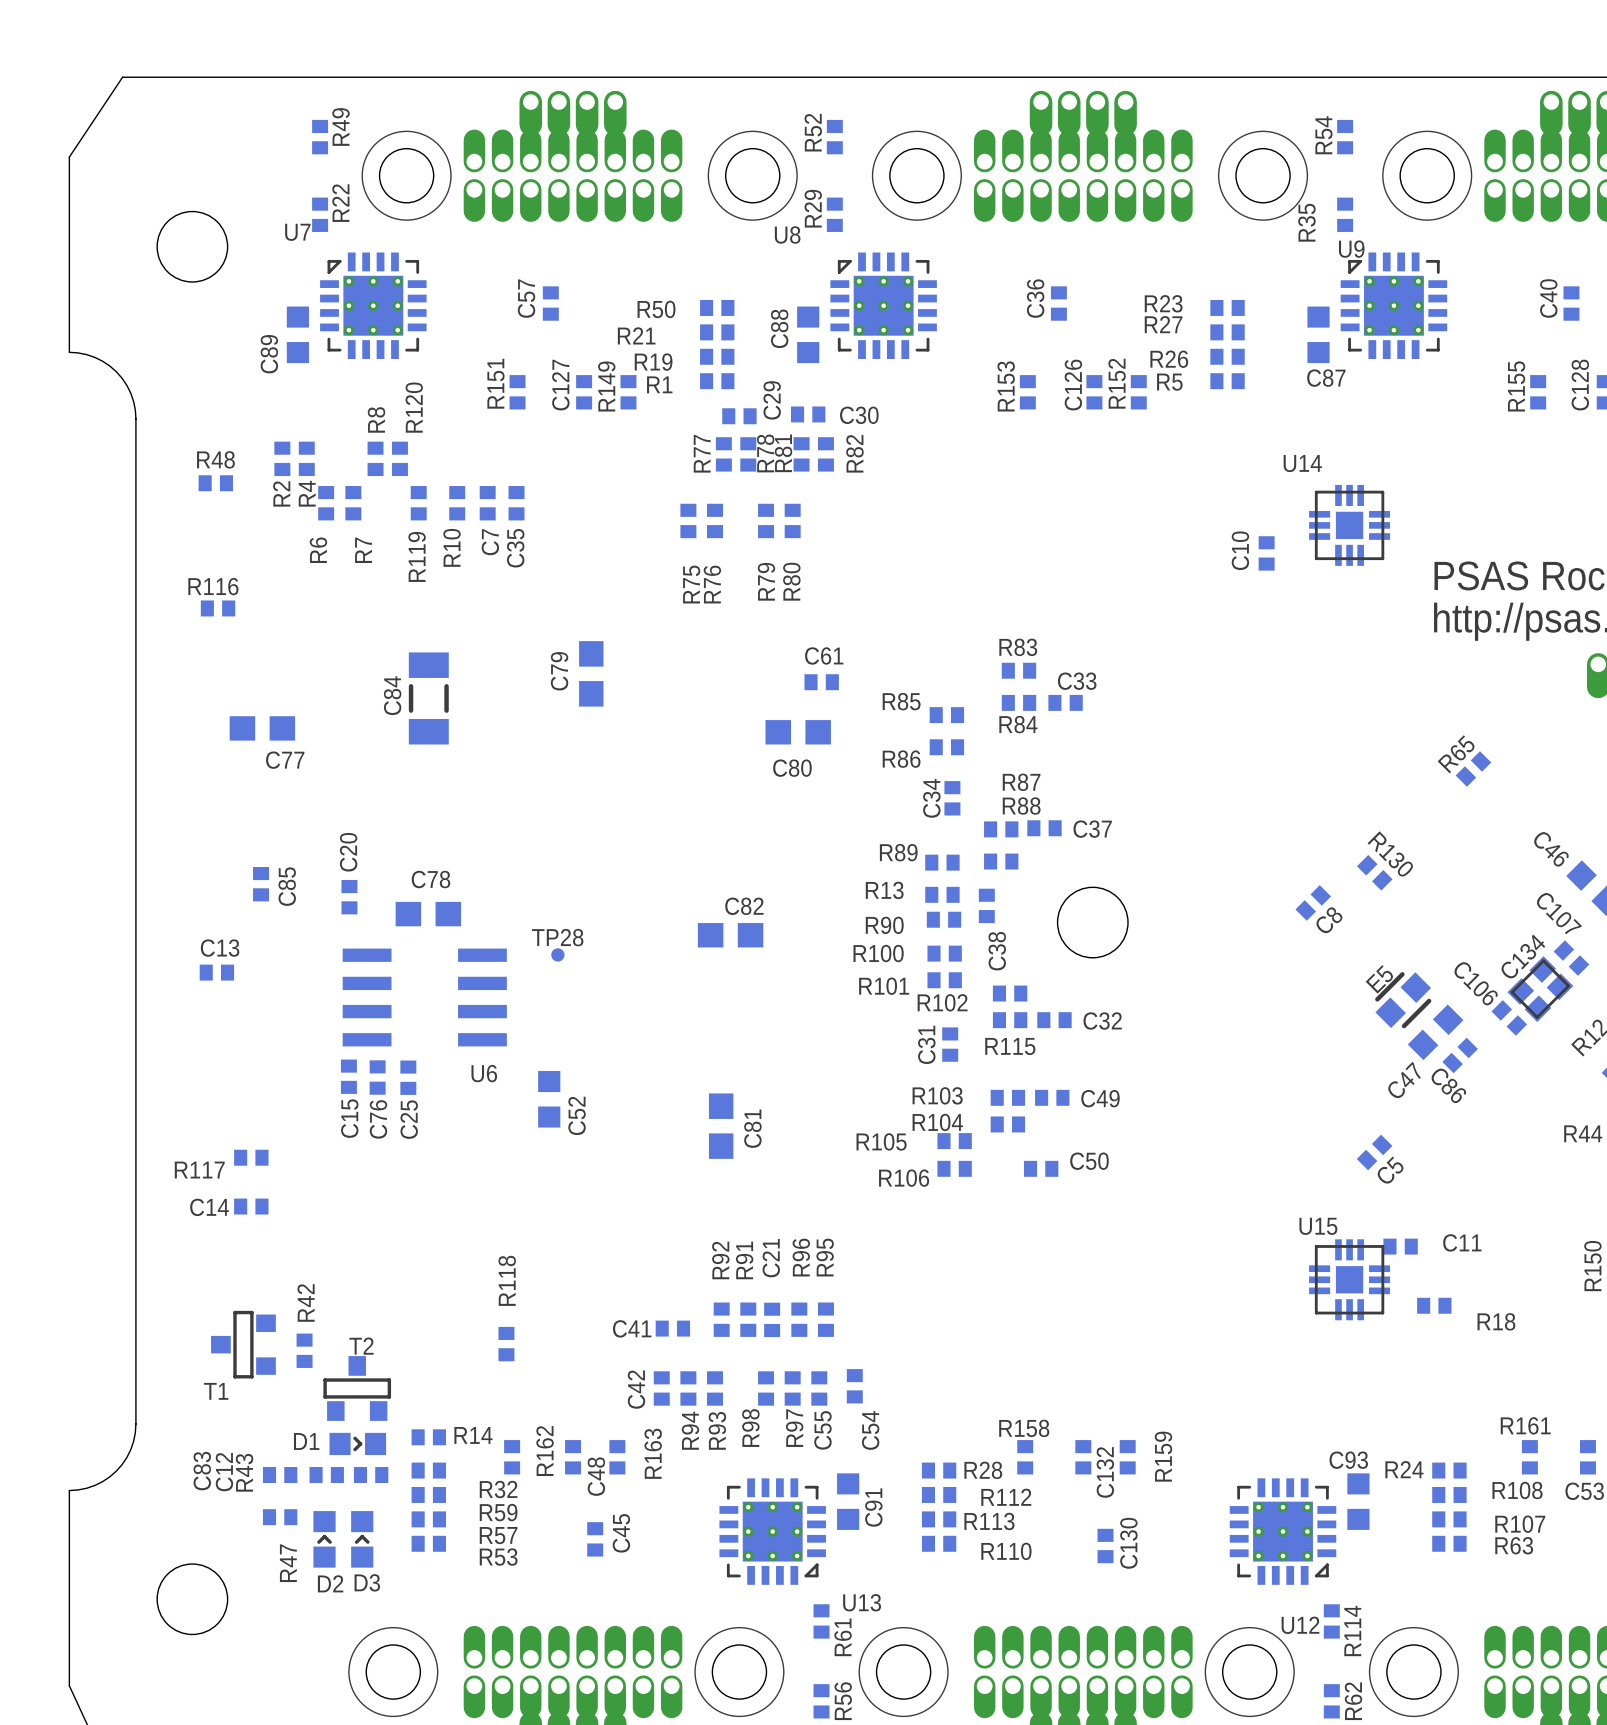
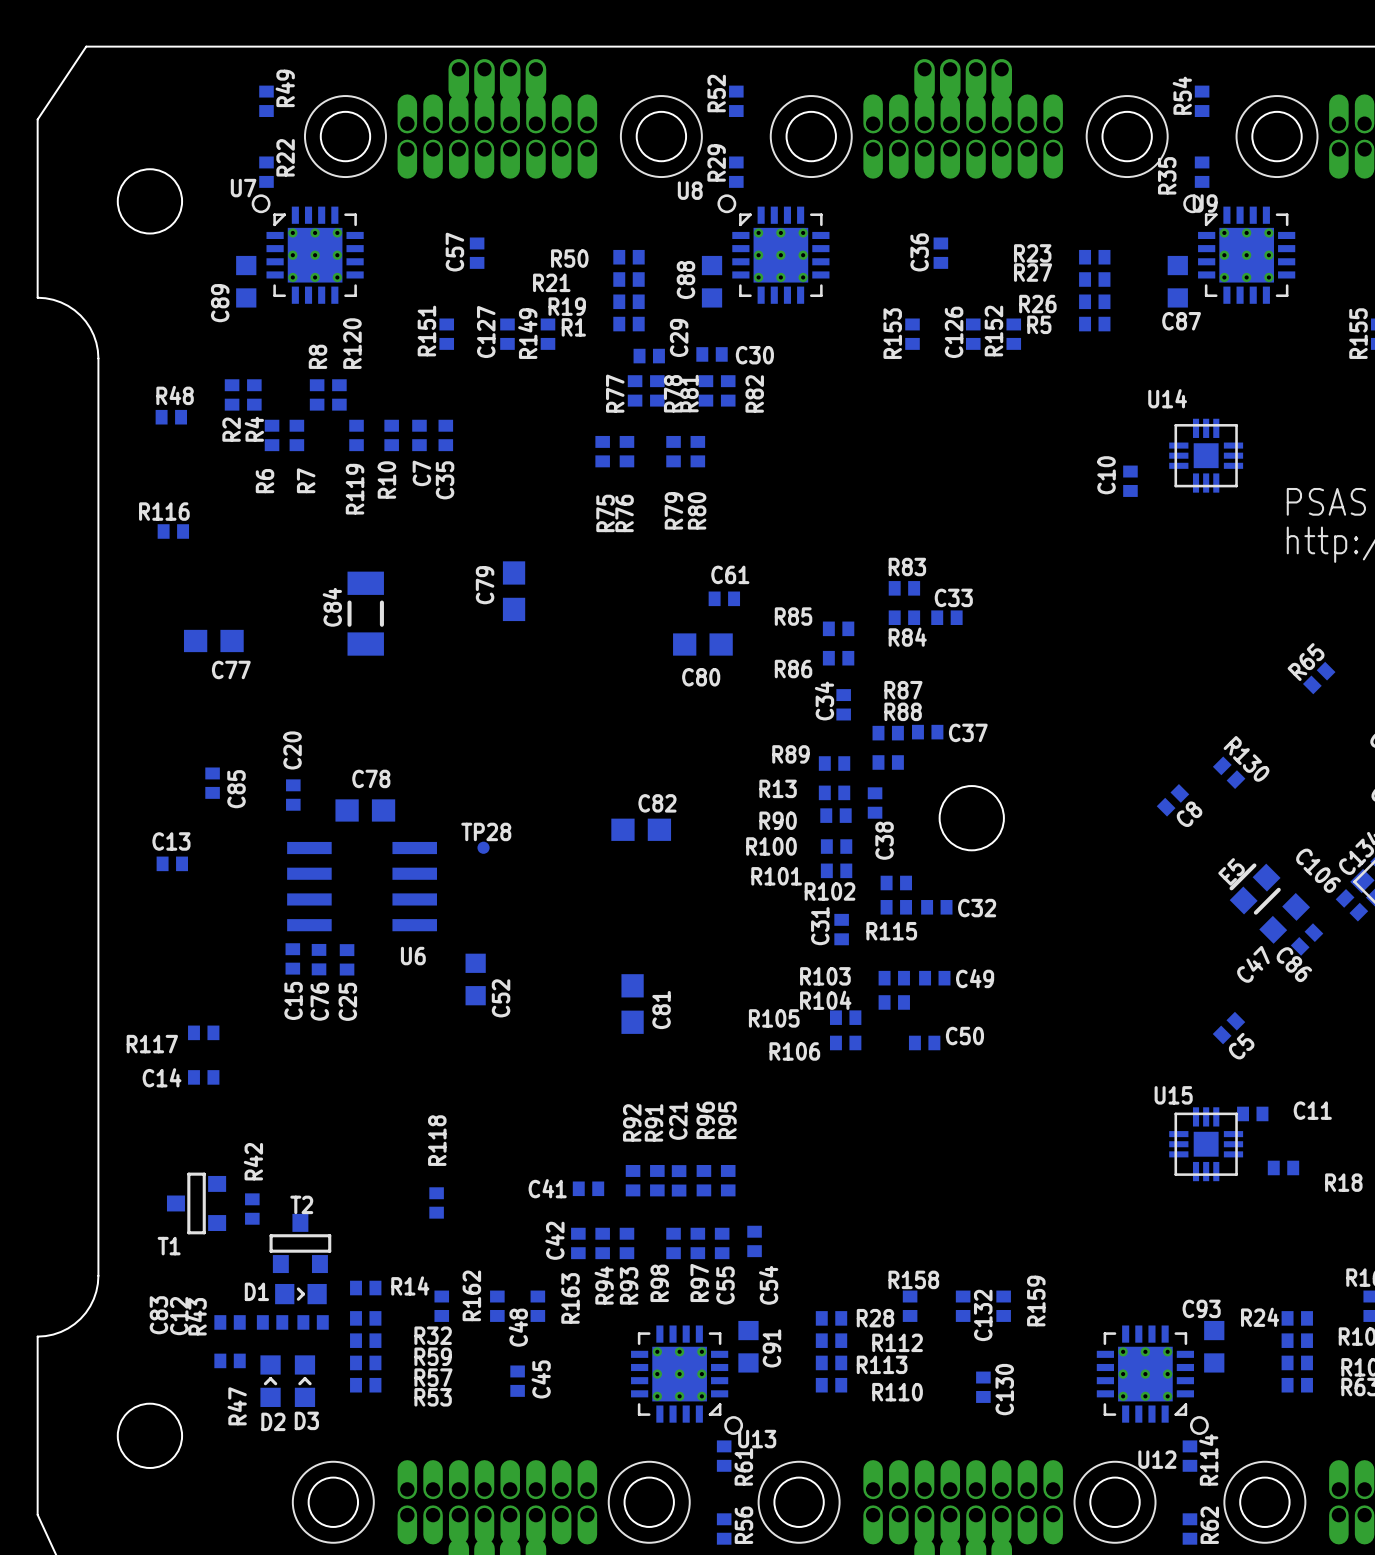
U7 footprint: [320, 252, 427, 359] -> [251, 194, 364, 304]
U8 footprint: [830, 252, 937, 359] -> [717, 194, 830, 304]
U9 footprint: [1340, 252, 1448, 359] -> [1183, 194, 1296, 304]
U13 footprint: [719, 1478, 826, 1585] -> [631, 1325, 744, 1435]
U12 footprint: [1229, 1478, 1337, 1585] -> [1096, 1325, 1209, 1435]

